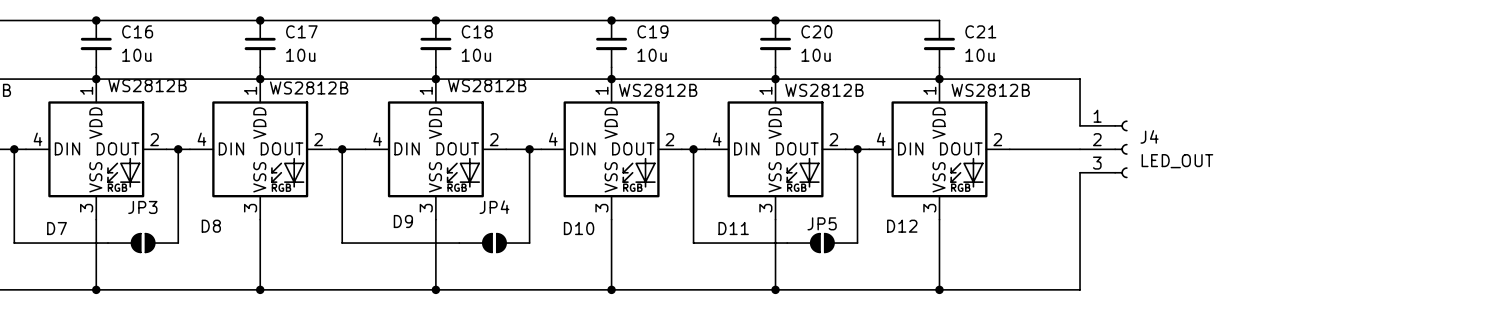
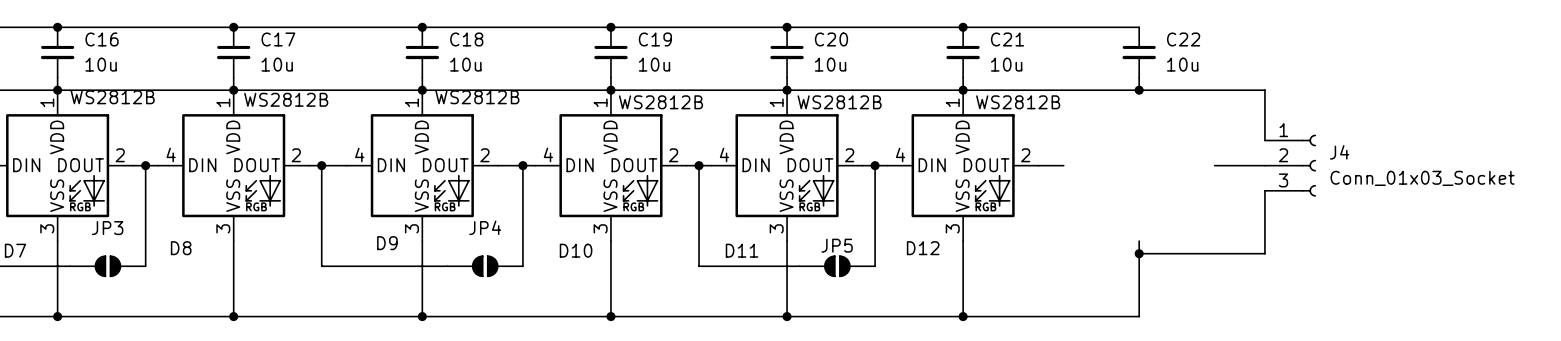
wire: none -> (963, 27) (1139, 27)
junction: none -> (963, 27)
C22: none -> 10u (1139, 52)
wire: none -> (1139, 77) (1139, 90)
wire: (1080, 79) (1080, 125) -> (1114, 90) (1264, 90) (1264, 140)
junction: none -> (1139, 90)
wire: (1033, 149) (1080, 149) -> (1214, 165) (1264, 165)
J4 position: (1103, 149) -> (1290, 165)
J4 value: LED_OUT (1177, 161) -> Conn_01x03_Socket (1422, 178)
wire: (1080, 172) (1080, 289) -> (1139, 241) (1139, 316) (1114, 316)
wire: none -> (1264, 190) (1264, 253) (1139, 253)
junction: none -> (1139, 253)

